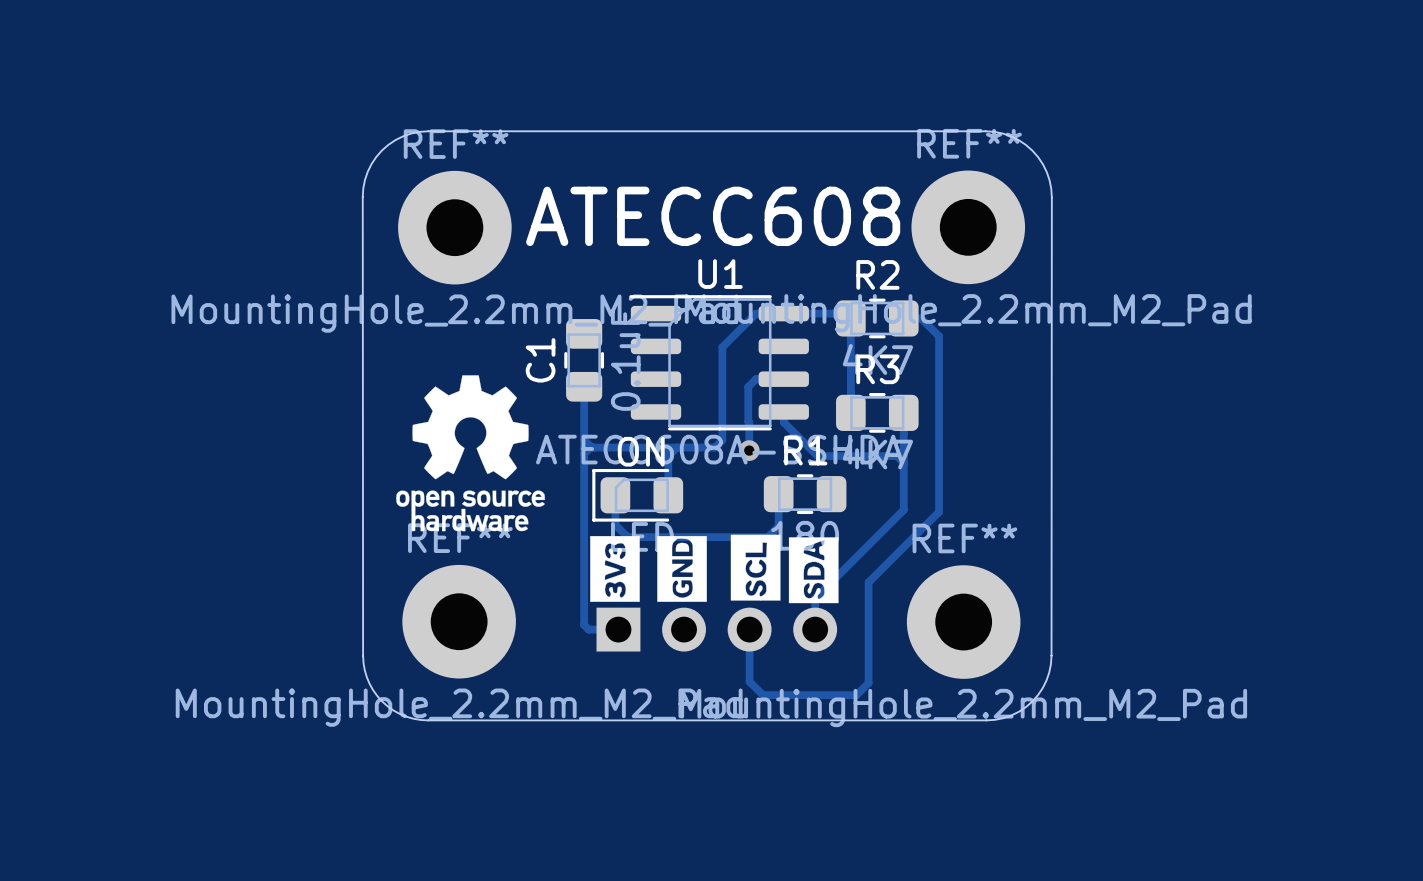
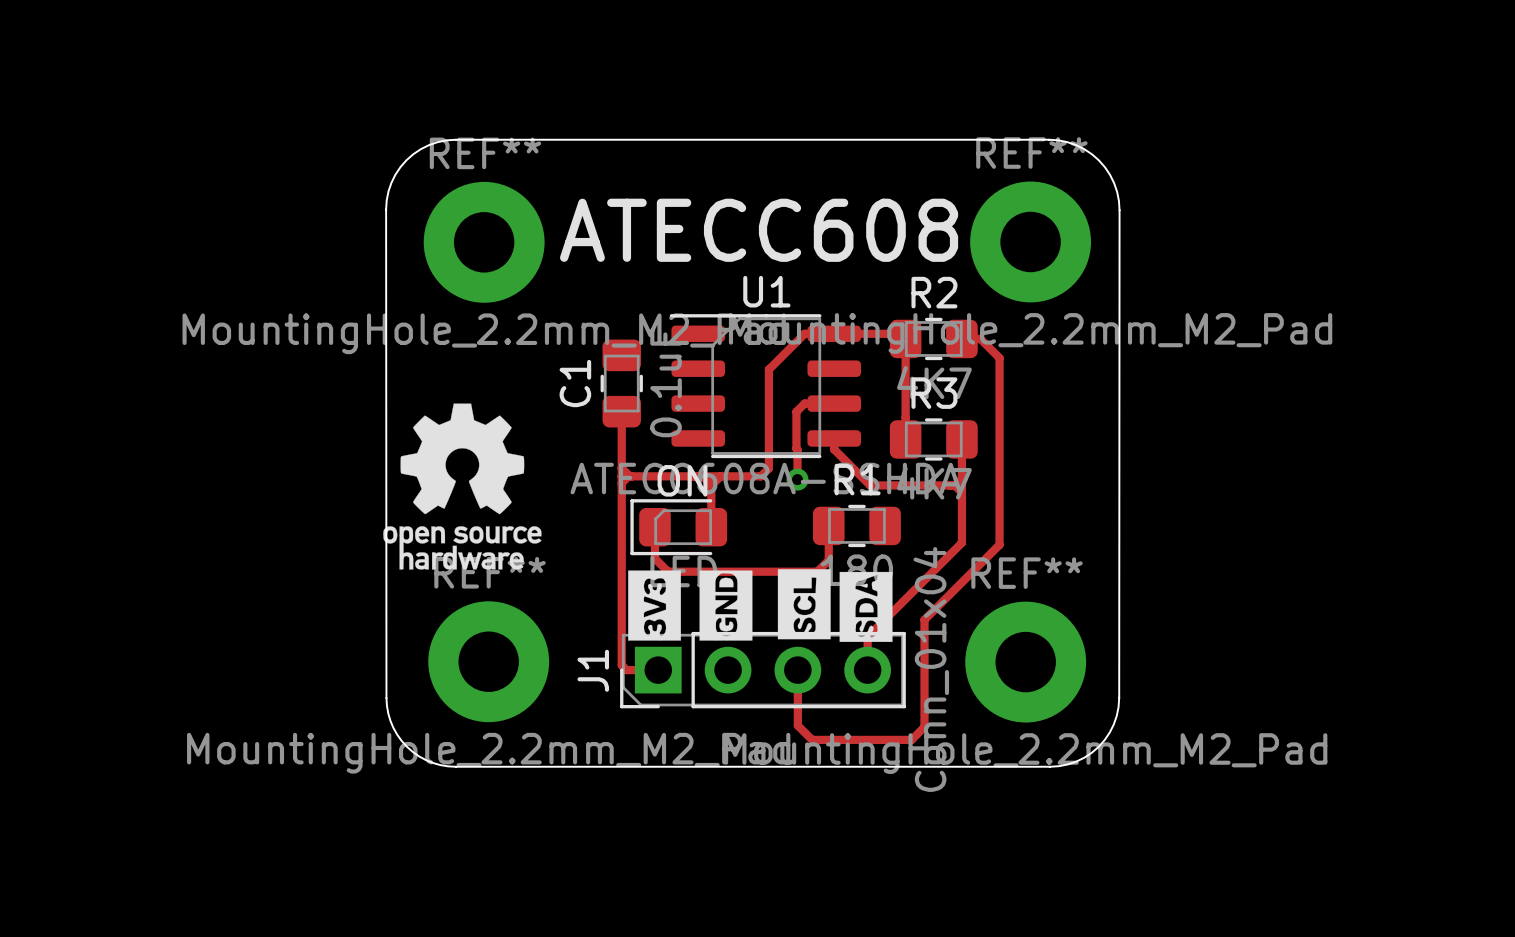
drawing position: (470, 453) -> (462, 486)
J1 side: bottom (716, 629) -> top (762, 670)

